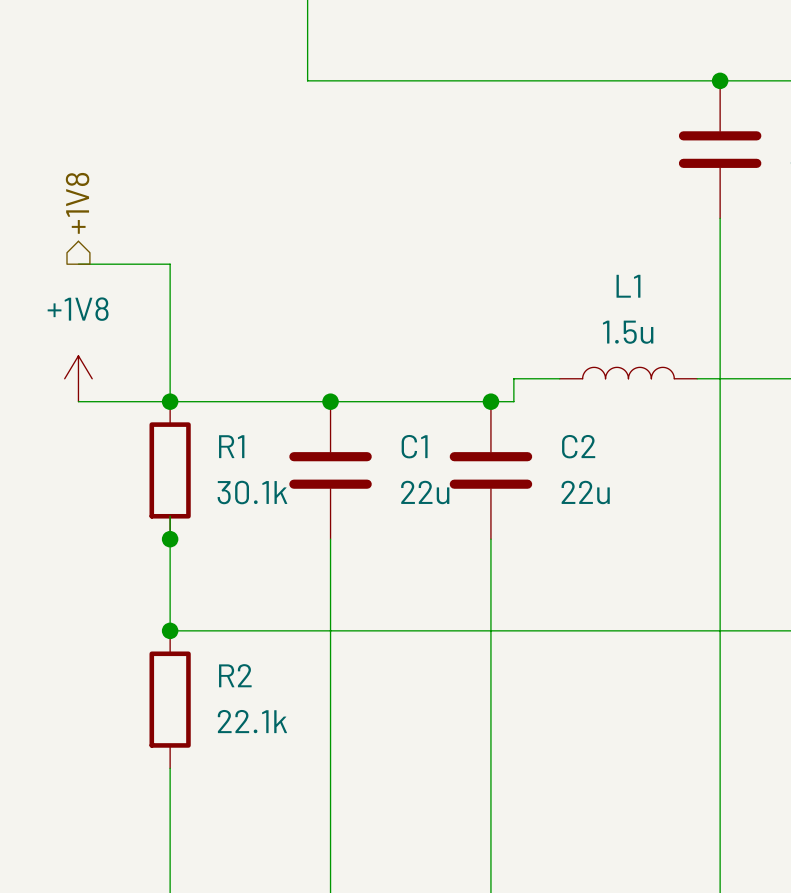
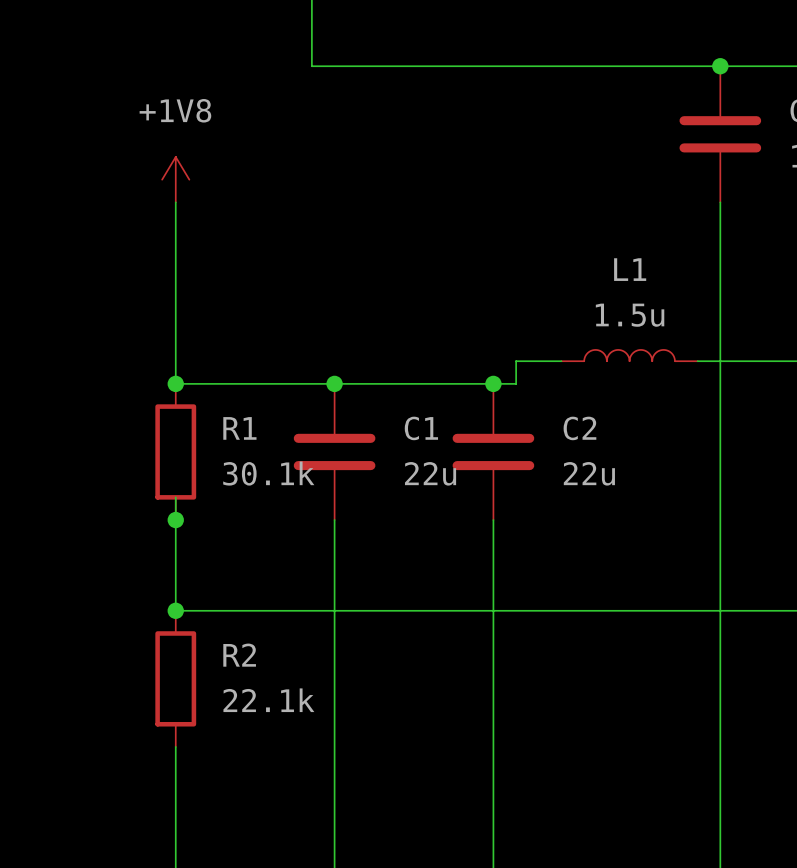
hierarchical label: +1V8 (77, 203) -> none
wire: (78, 264) (170, 264) -> (175, 202) (175, 247)
power symbol position: +1V8 (78, 378) -> +1V8 (175, 179)
wire: (78, 401) (170, 401) -> none

